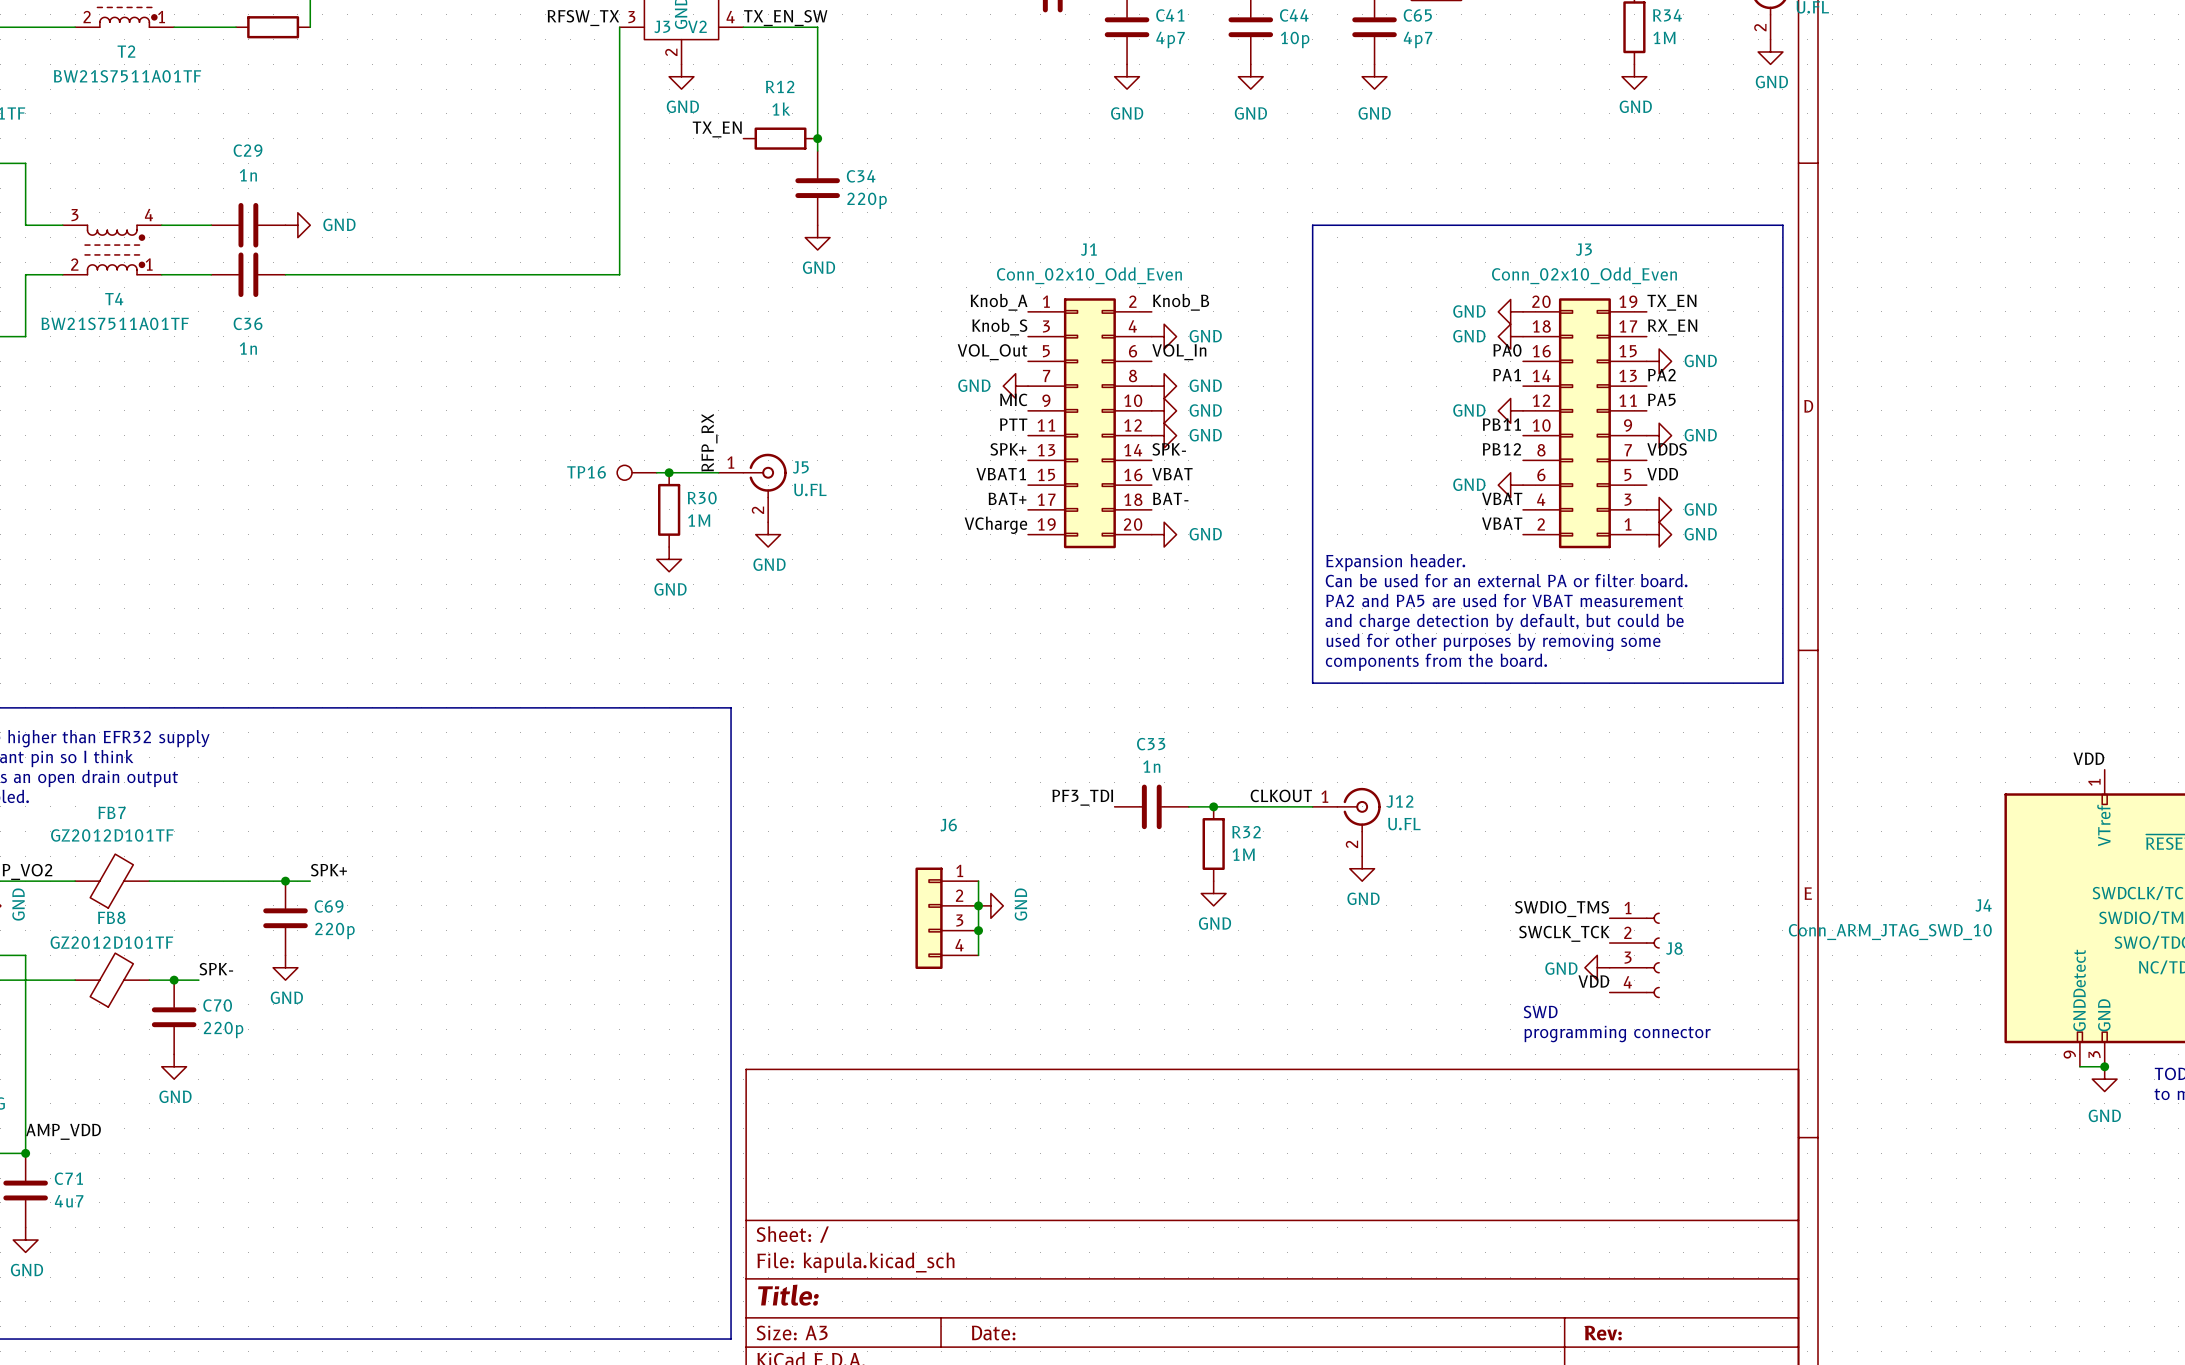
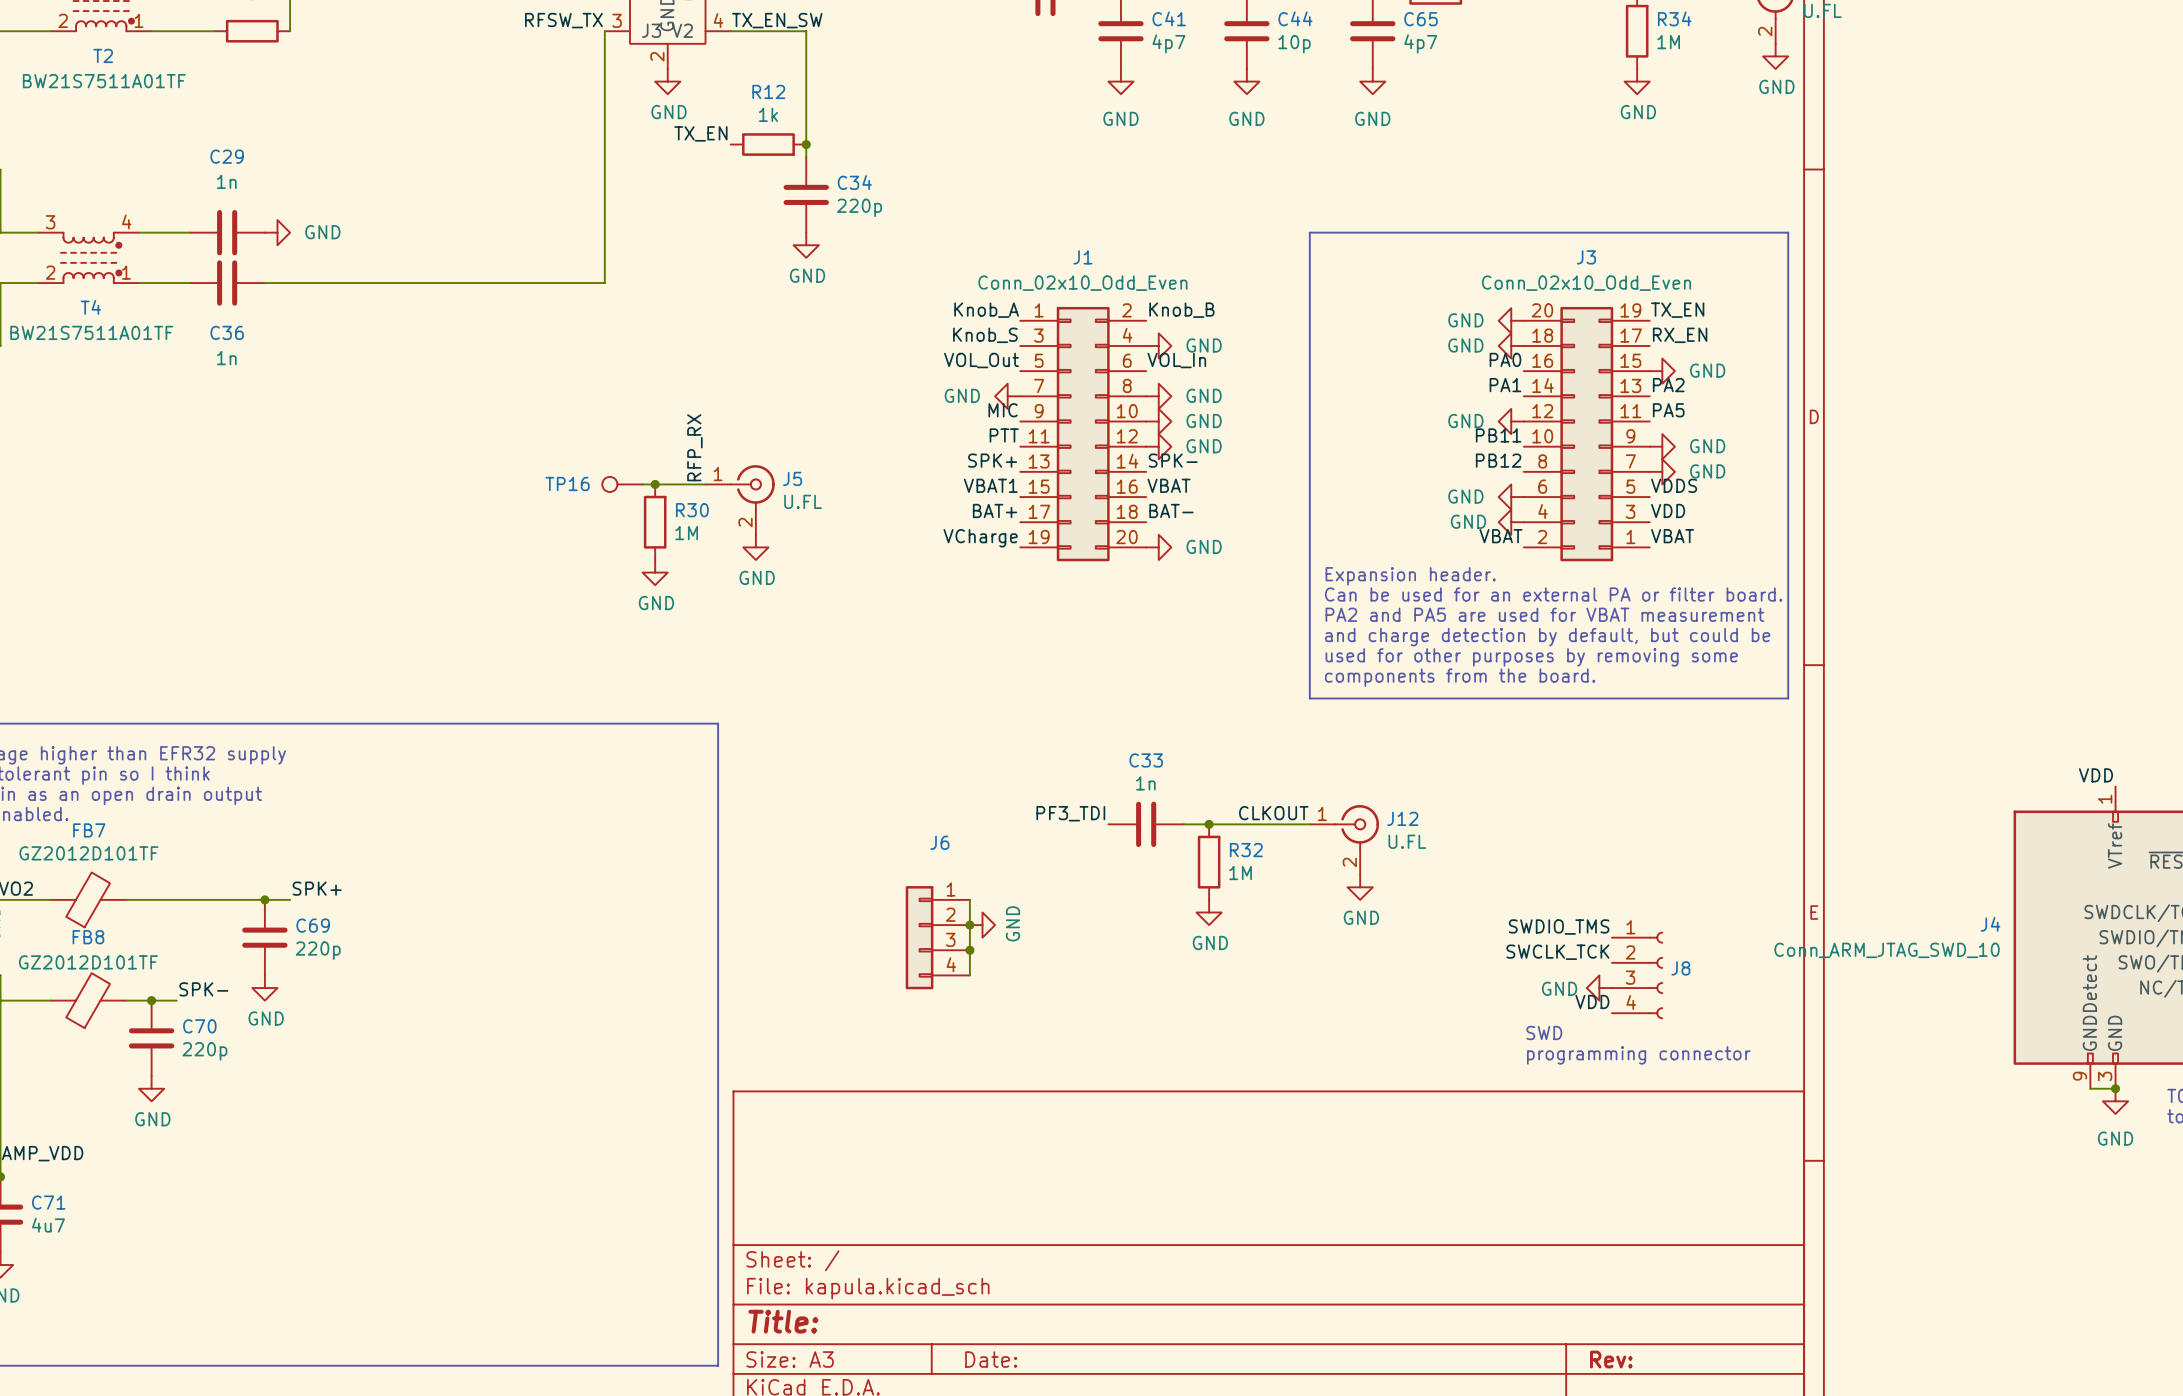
label: VDDS (1667, 449) -> none
power symbol: none -> GND (1662, 471)
label: VDD (1662, 474) -> VDDS (1674, 485)
label position: VBAT (1502, 498) -> VBAT (1672, 536)
label: none -> VDD (1668, 510)
power symbol: none -> GND (1511, 522)
power symbol: GND (1659, 509) -> none
power symbol: GND (1659, 534) -> none

